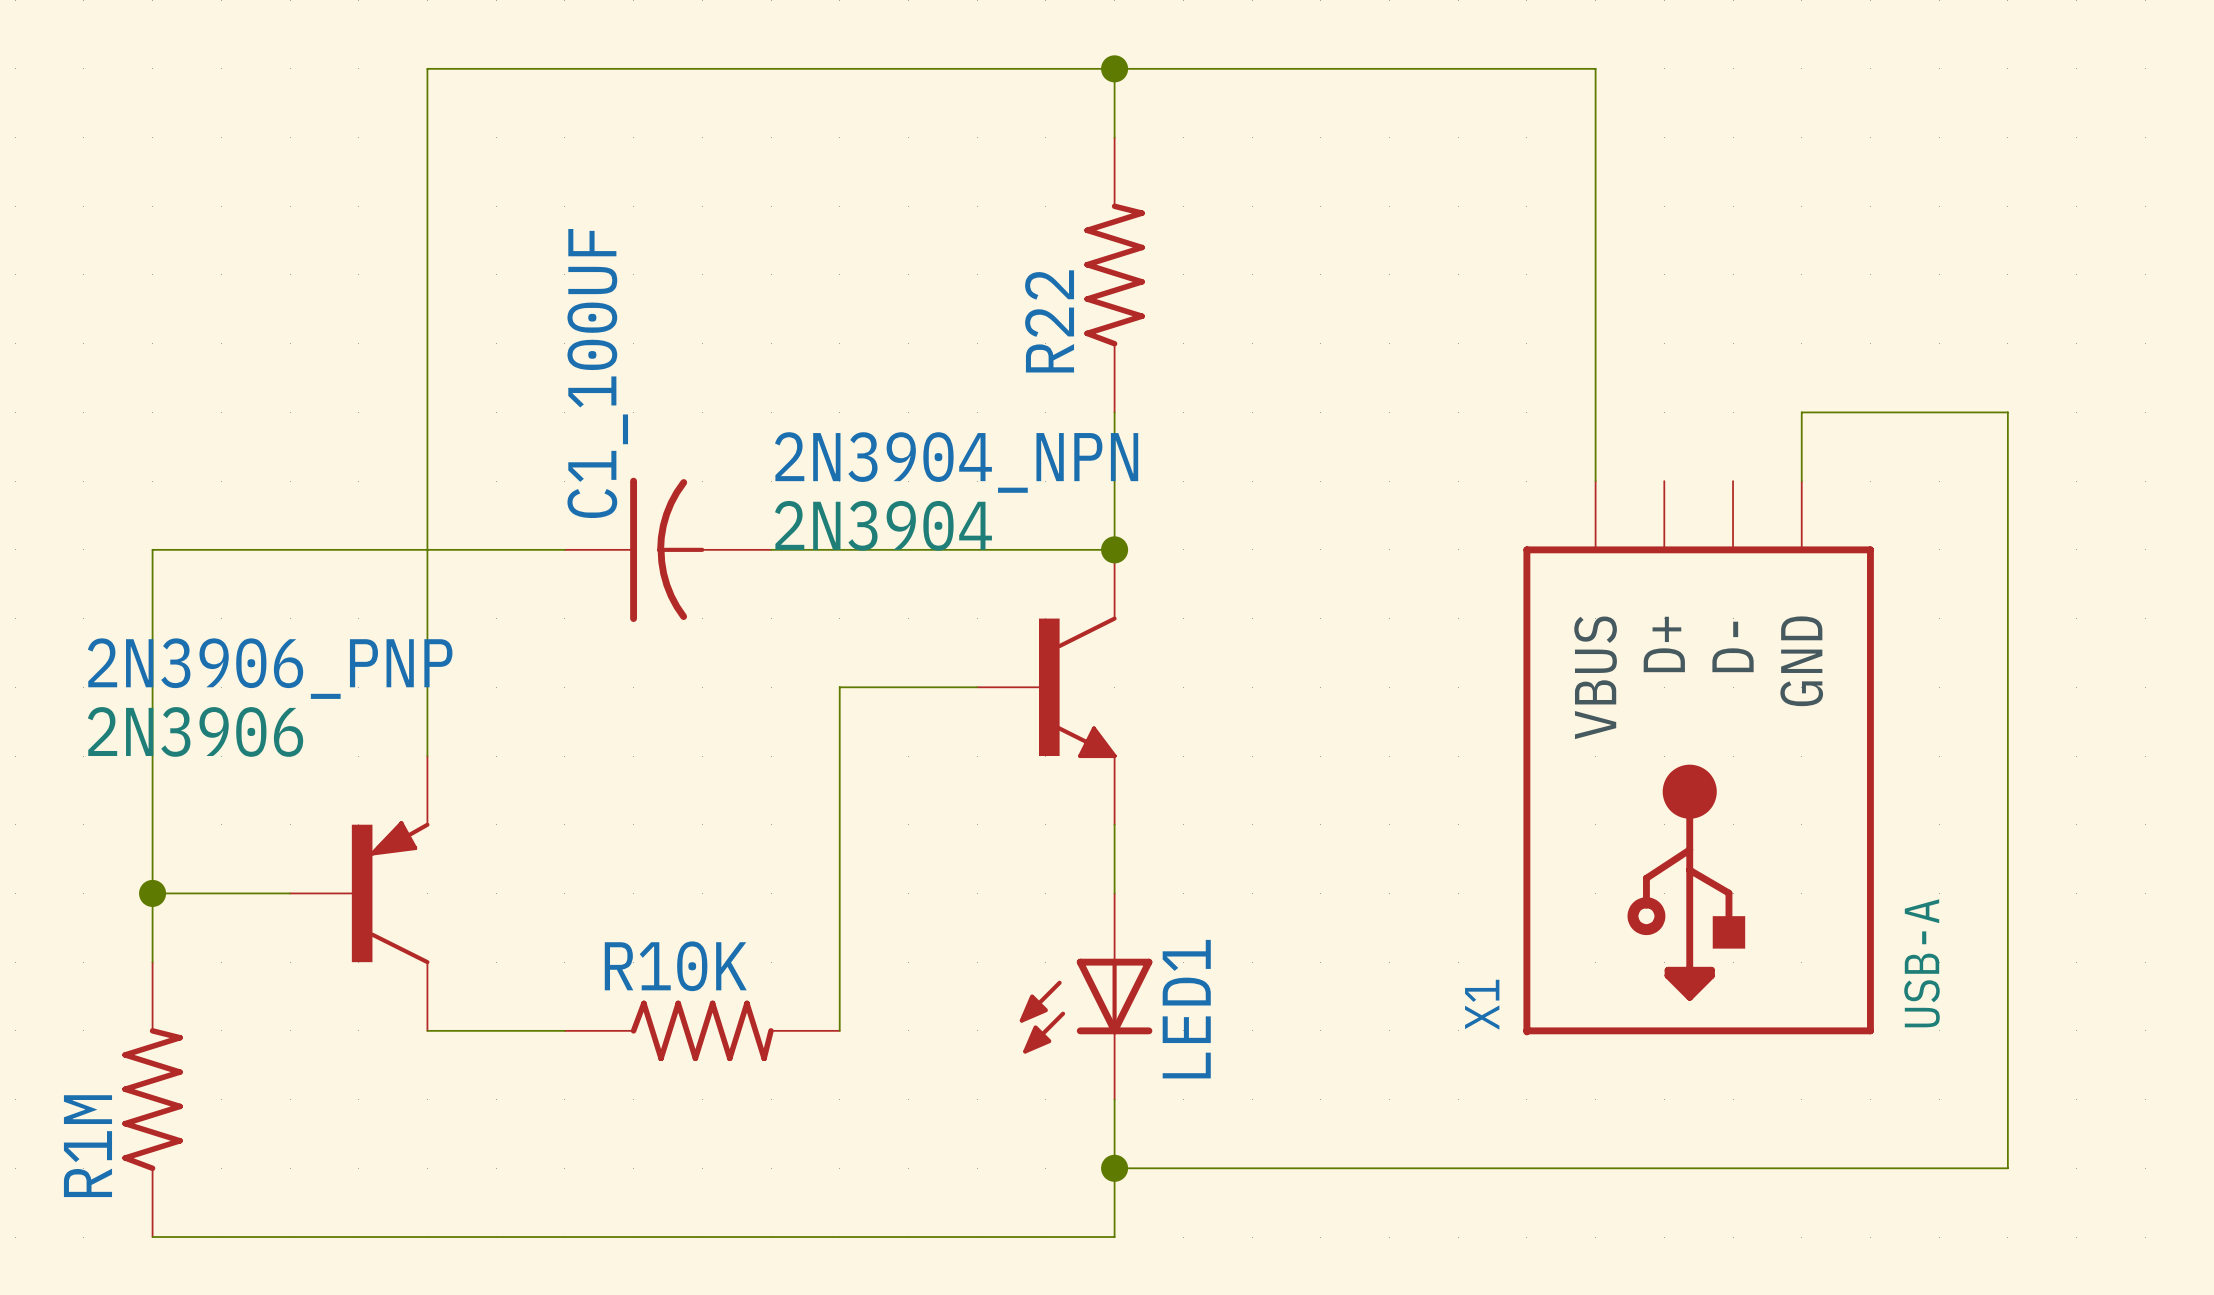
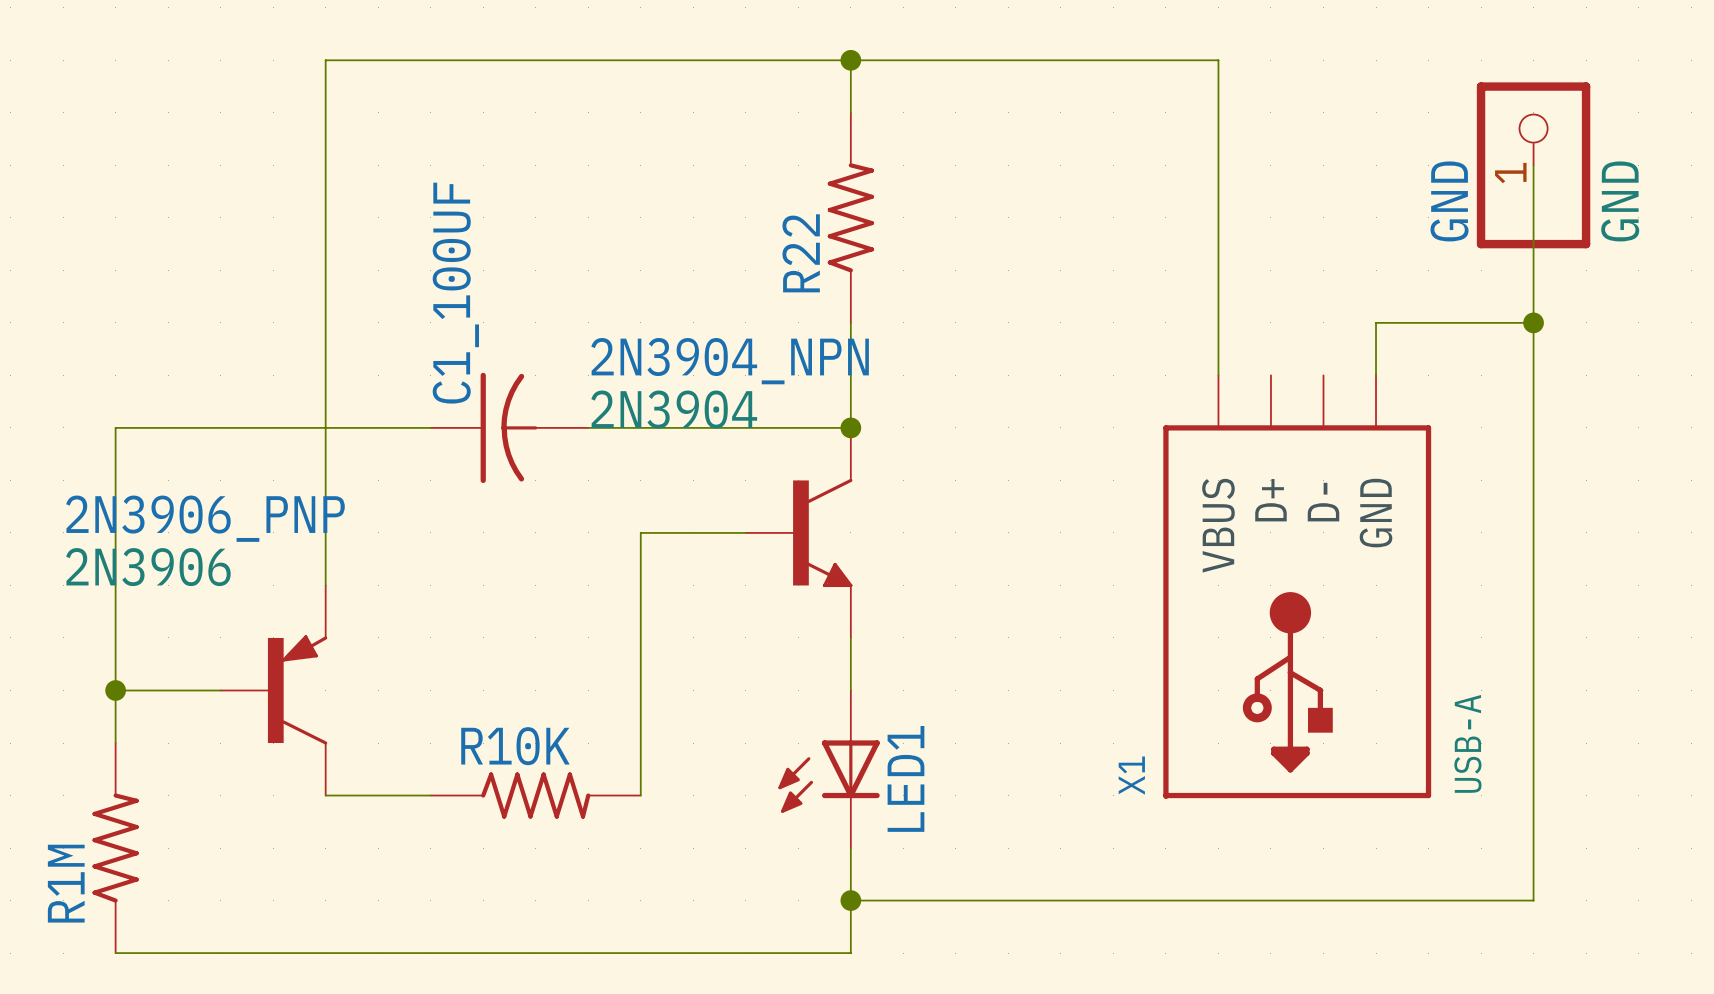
wire: none -> (1533, 165) (1533, 322)
GND: none -> GND (1533, 165)
junction: none -> (1533, 322)

